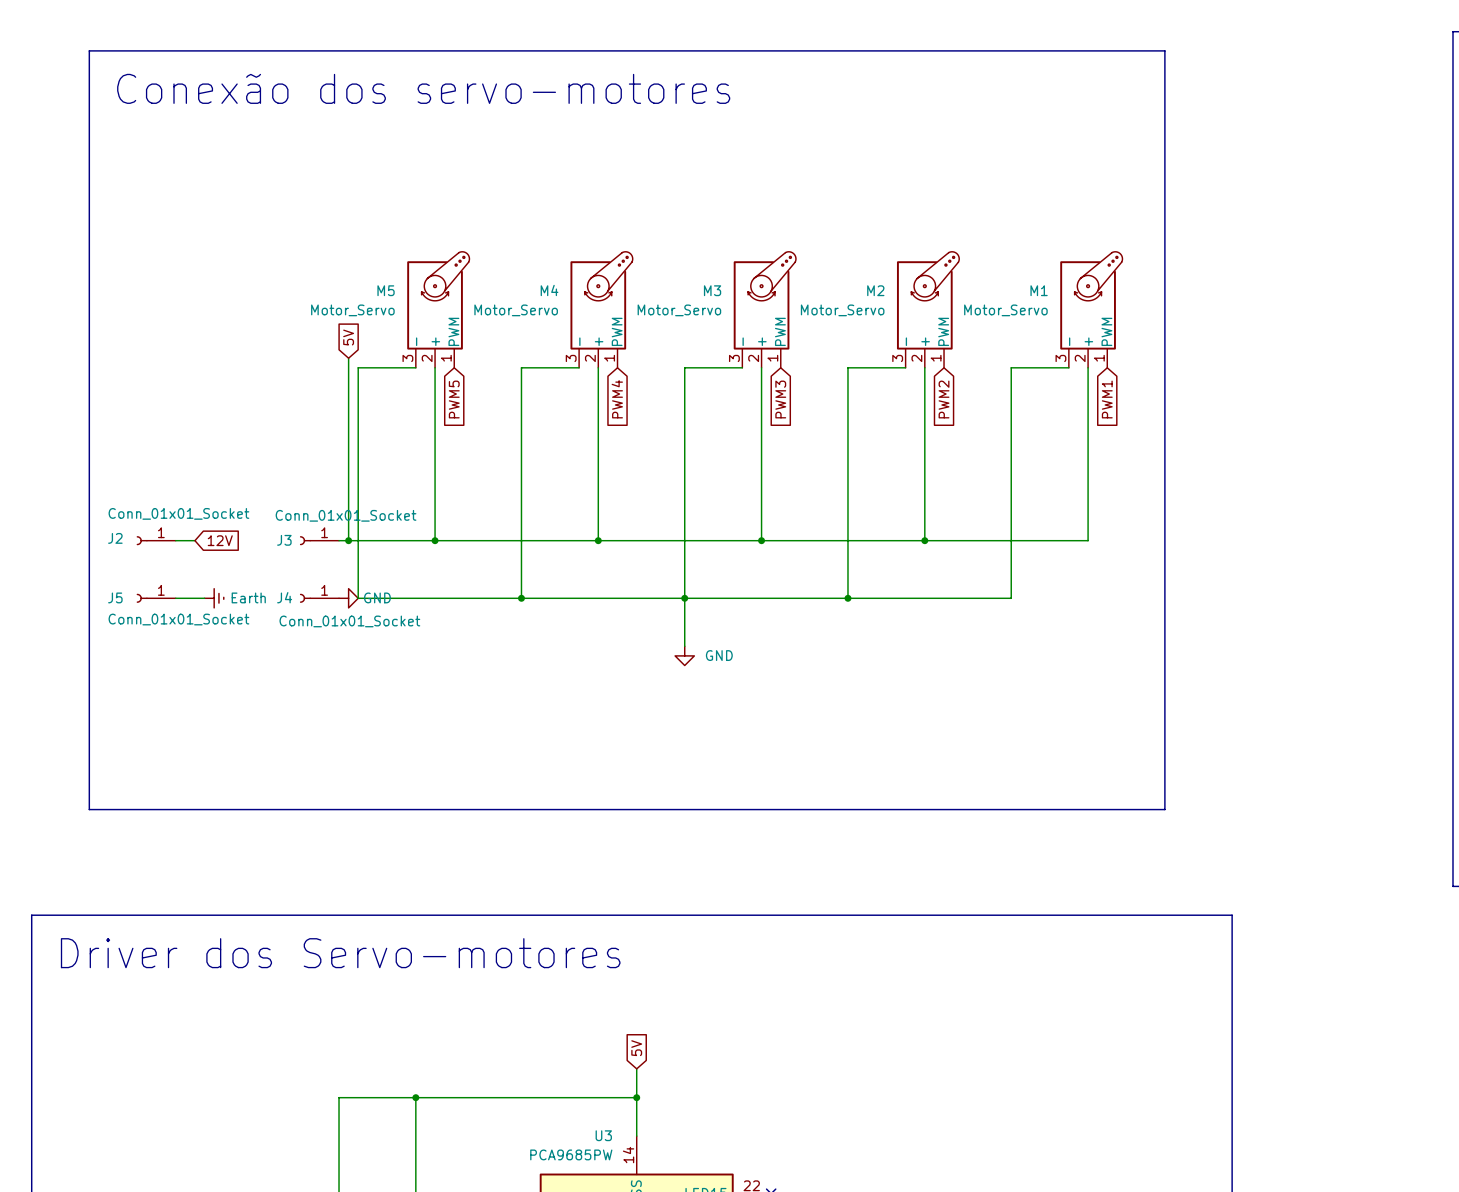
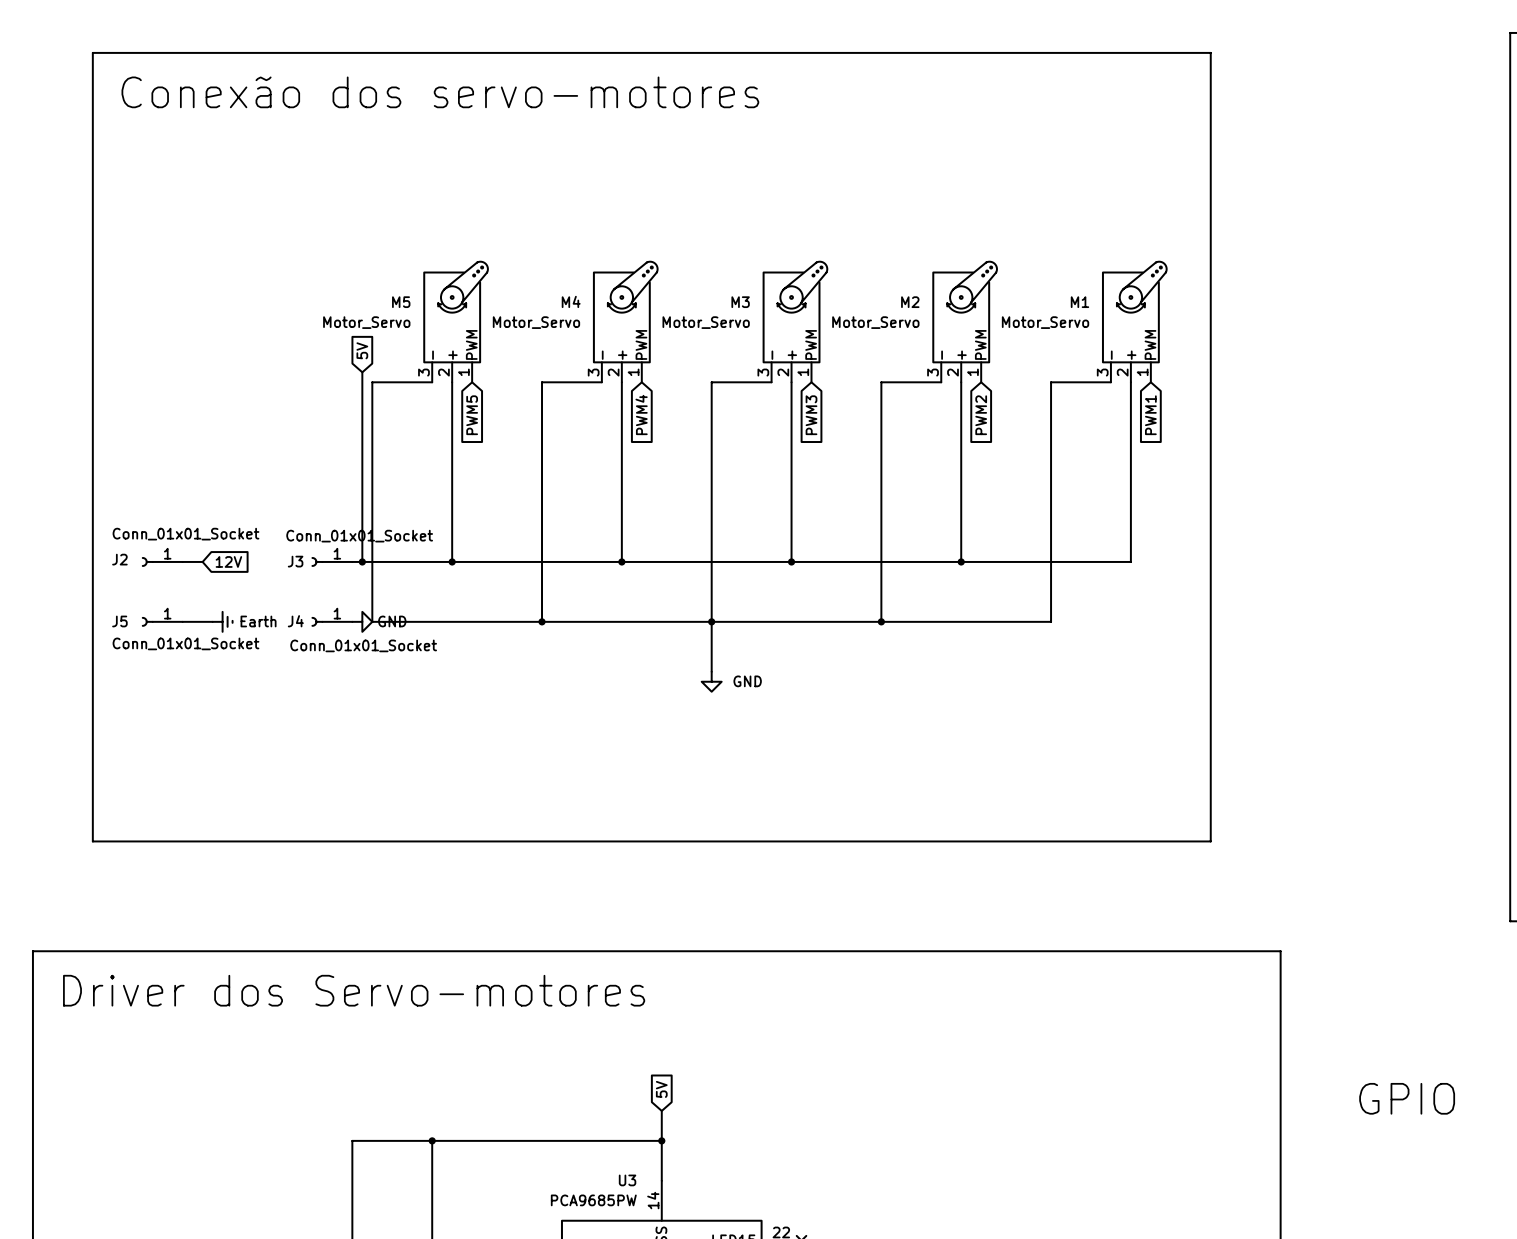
text: none -> GPIO (1407, 1098)

